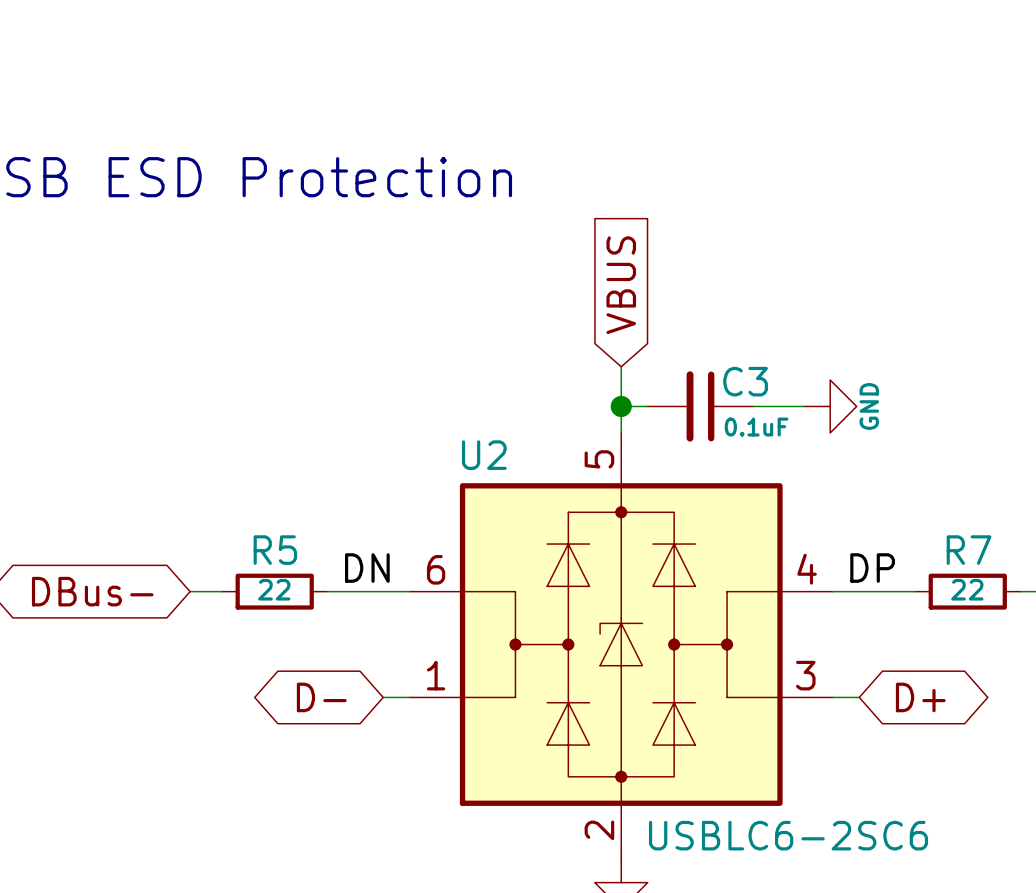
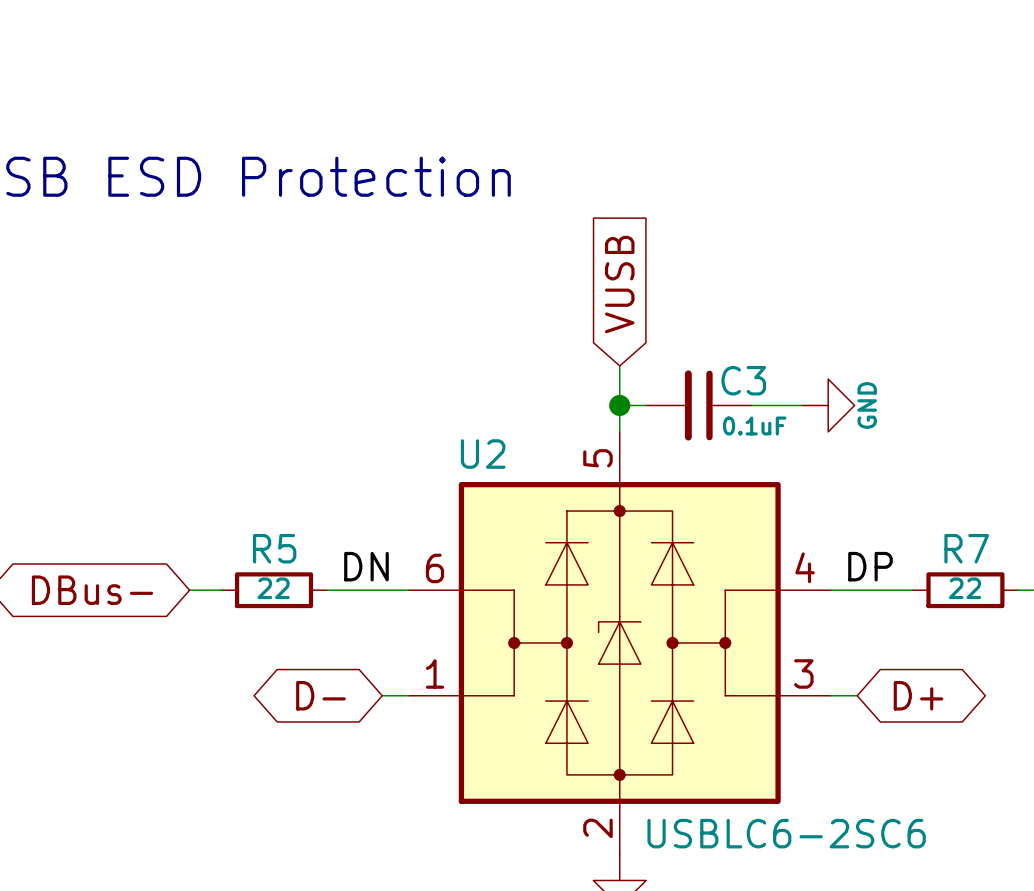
global label: VBUS (621, 285) -> VUSB (619, 284)

